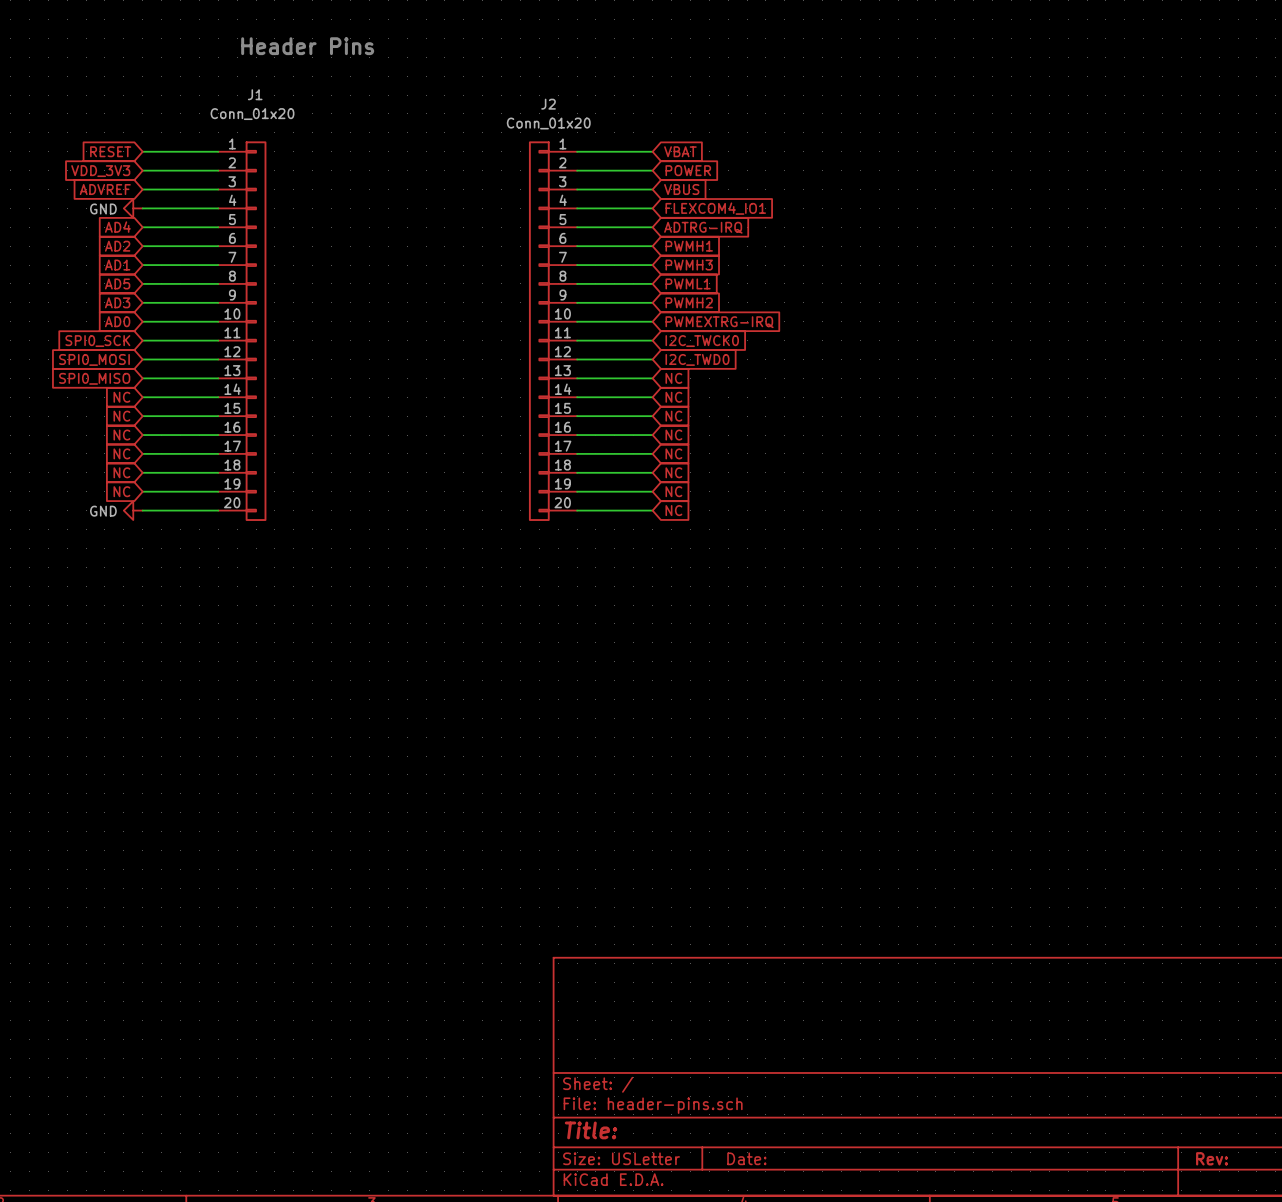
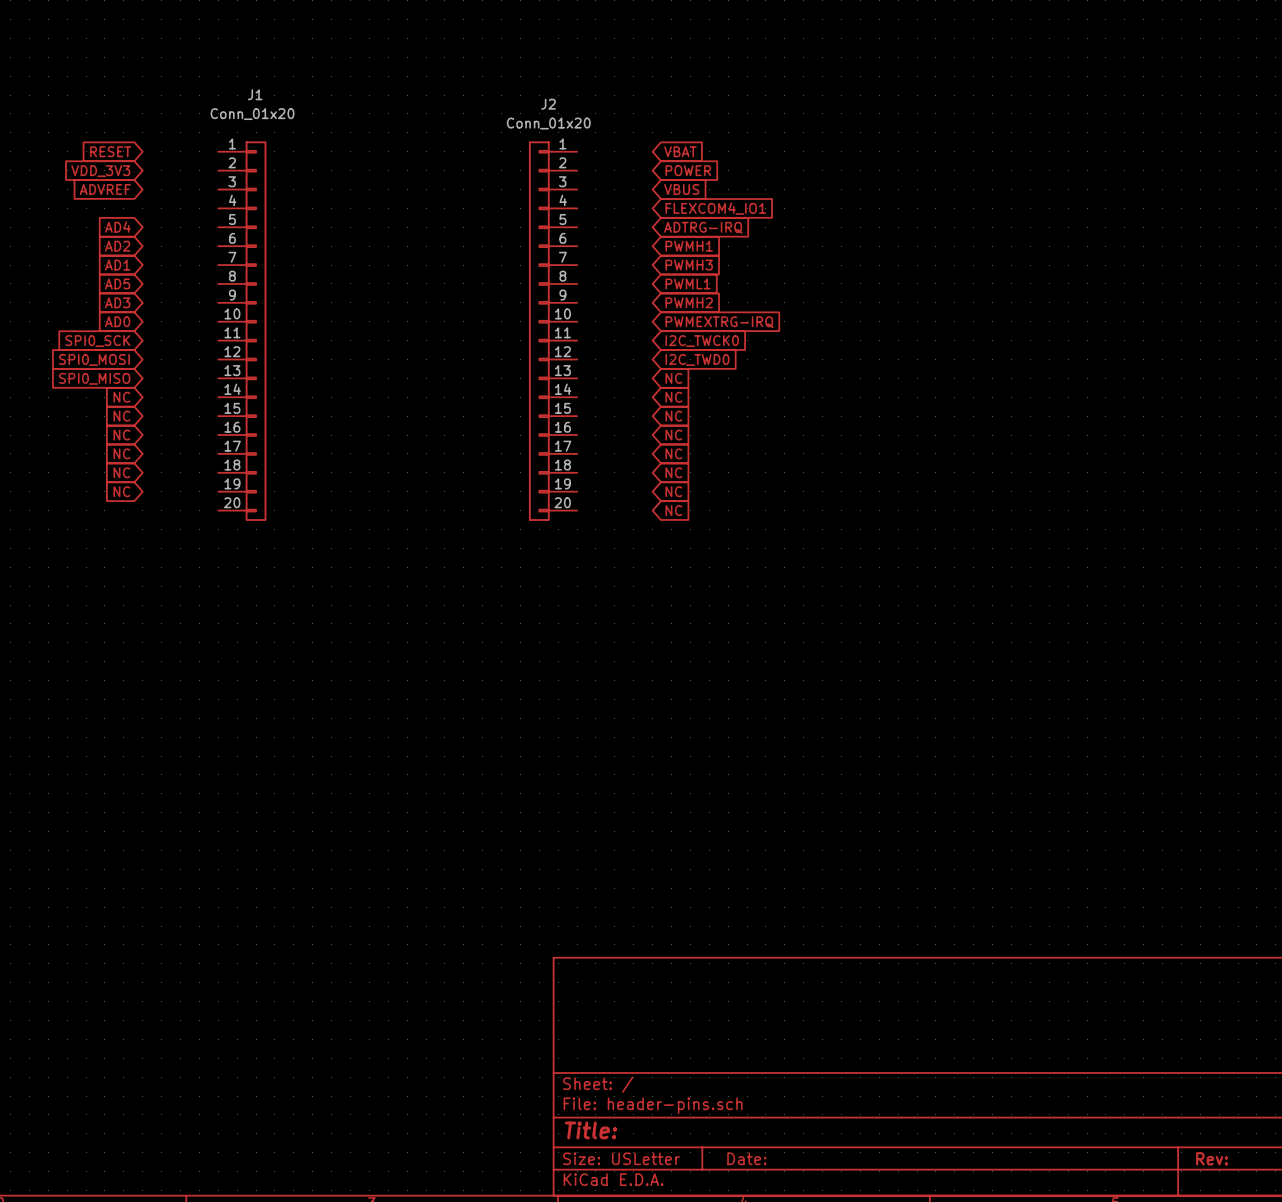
text: Header Pins (307, 46) -> none
wire: (142, 151) (218, 151) -> none
wire: (577, 151) (652, 151) -> none
wire: (142, 170) (218, 170) -> none
wire: (577, 170) (652, 170) -> none
wire: (142, 189) (218, 189) -> none
wire: (577, 189) (652, 189) -> none
power symbol: GND (133, 208) -> none
wire: (142, 208) (218, 208) -> none
wire: (577, 208) (652, 208) -> none
wire: (142, 227) (218, 227) -> none
wire: (577, 227) (652, 227) -> none
wire: (142, 246) (218, 246) -> none
wire: (577, 246) (652, 246) -> none
wire: (142, 265) (218, 265) -> none
wire: (577, 265) (652, 265) -> none
wire: (142, 283) (218, 283) -> none
wire: (577, 283) (652, 283) -> none
wire: (142, 302) (218, 302) -> none
wire: (577, 302) (652, 302) -> none
wire: (142, 321) (218, 321) -> none
wire: (577, 321) (652, 321) -> none
wire: (142, 340) (218, 340) -> none
wire: (577, 340) (652, 340) -> none
wire: (142, 359) (218, 359) -> none
wire: (577, 359) (652, 359) -> none
wire: (142, 378) (218, 378) -> none
wire: (577, 378) (652, 378) -> none
wire: (142, 397) (218, 397) -> none
wire: (577, 397) (652, 397) -> none
wire: (142, 416) (218, 416) -> none
wire: (577, 416) (652, 416) -> none
wire: (142, 435) (218, 435) -> none
wire: (577, 435) (652, 435) -> none
wire: (142, 453) (218, 453) -> none
wire: (577, 453) (652, 453) -> none
wire: (142, 472) (218, 472) -> none
wire: (577, 472) (652, 472) -> none
wire: (142, 491) (218, 491) -> none
wire: (577, 491) (652, 491) -> none
power symbol: GND (133, 510) -> none
wire: (142, 510) (218, 510) -> none
wire: (577, 510) (652, 510) -> none

